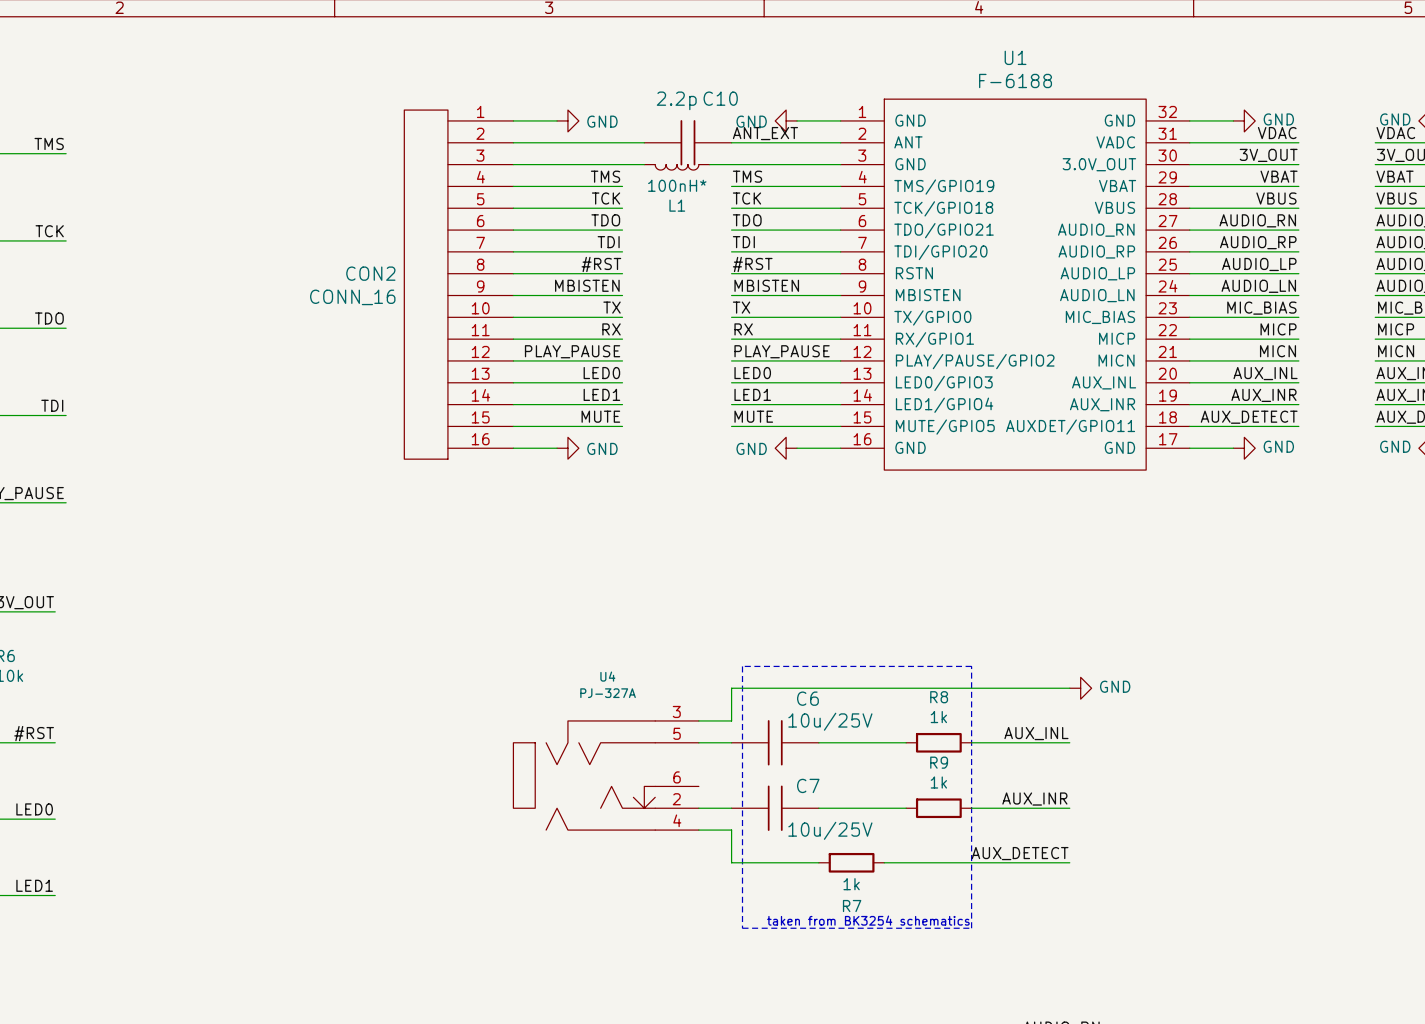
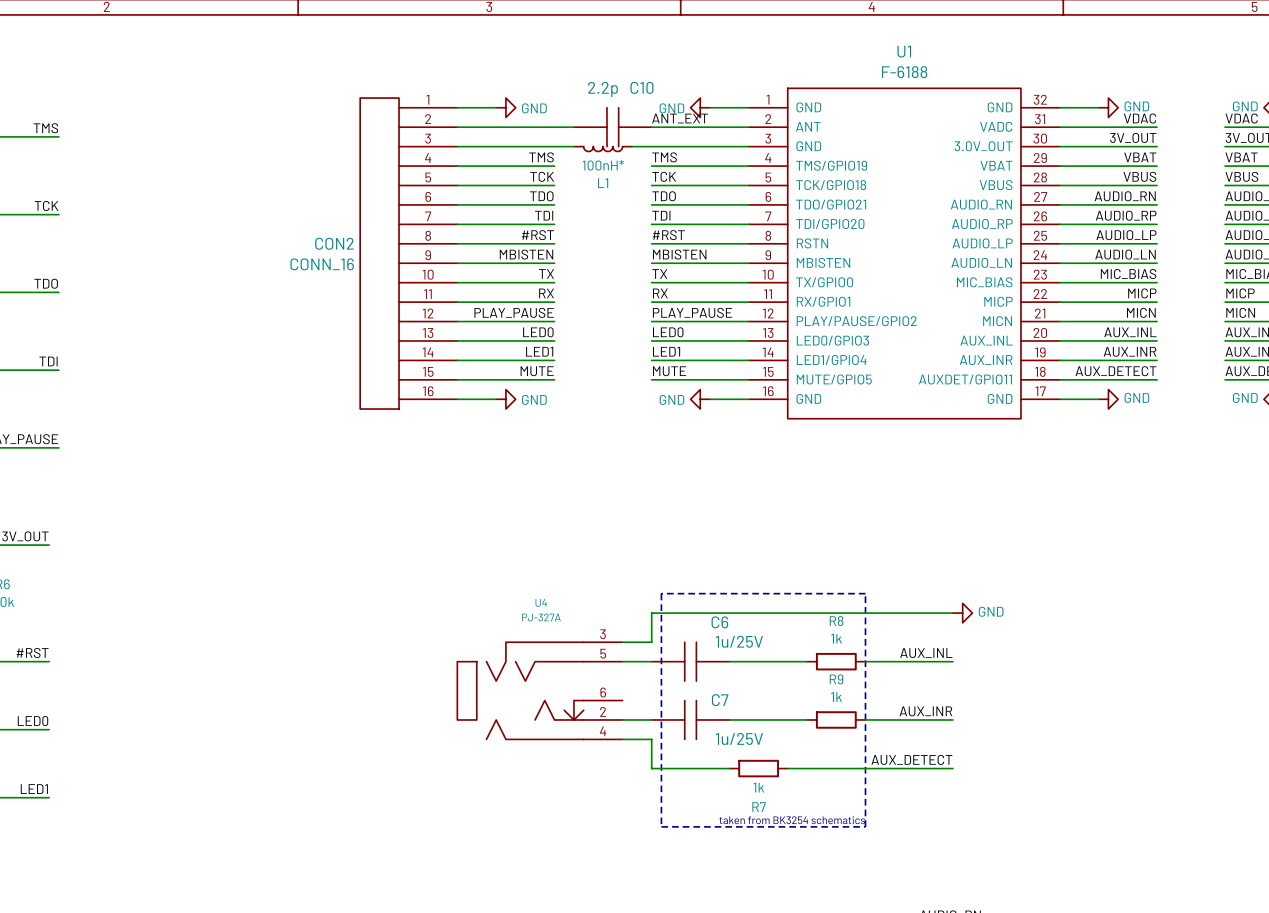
C6 value: 10u/25V (830, 721) -> 1u/25V (739, 641)
C7 value: 10u/25V (830, 830) -> 1u/25V (739, 738)

